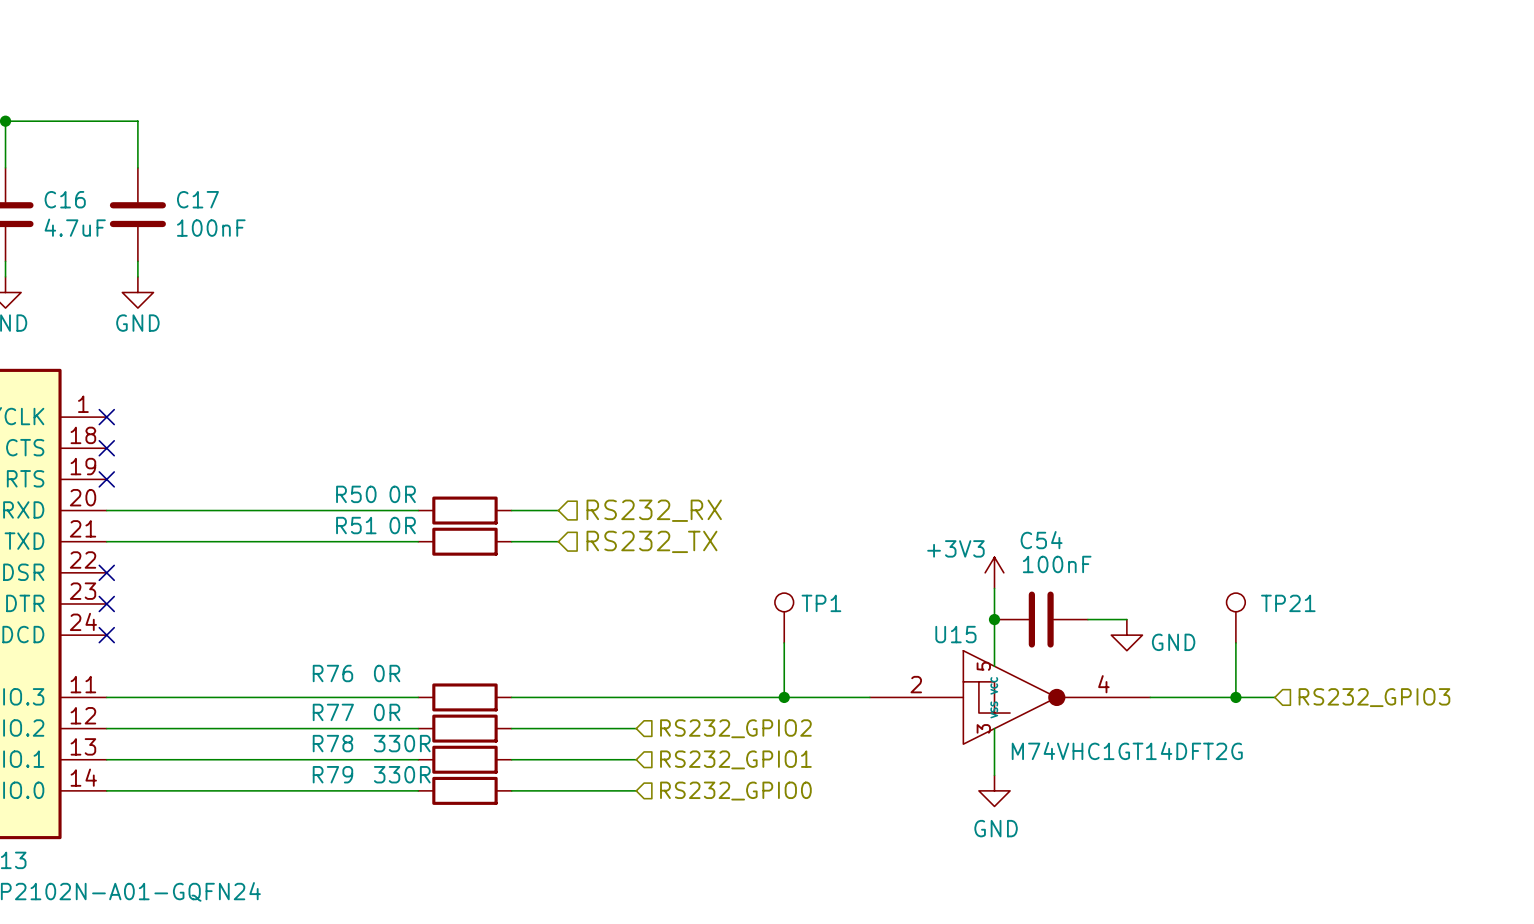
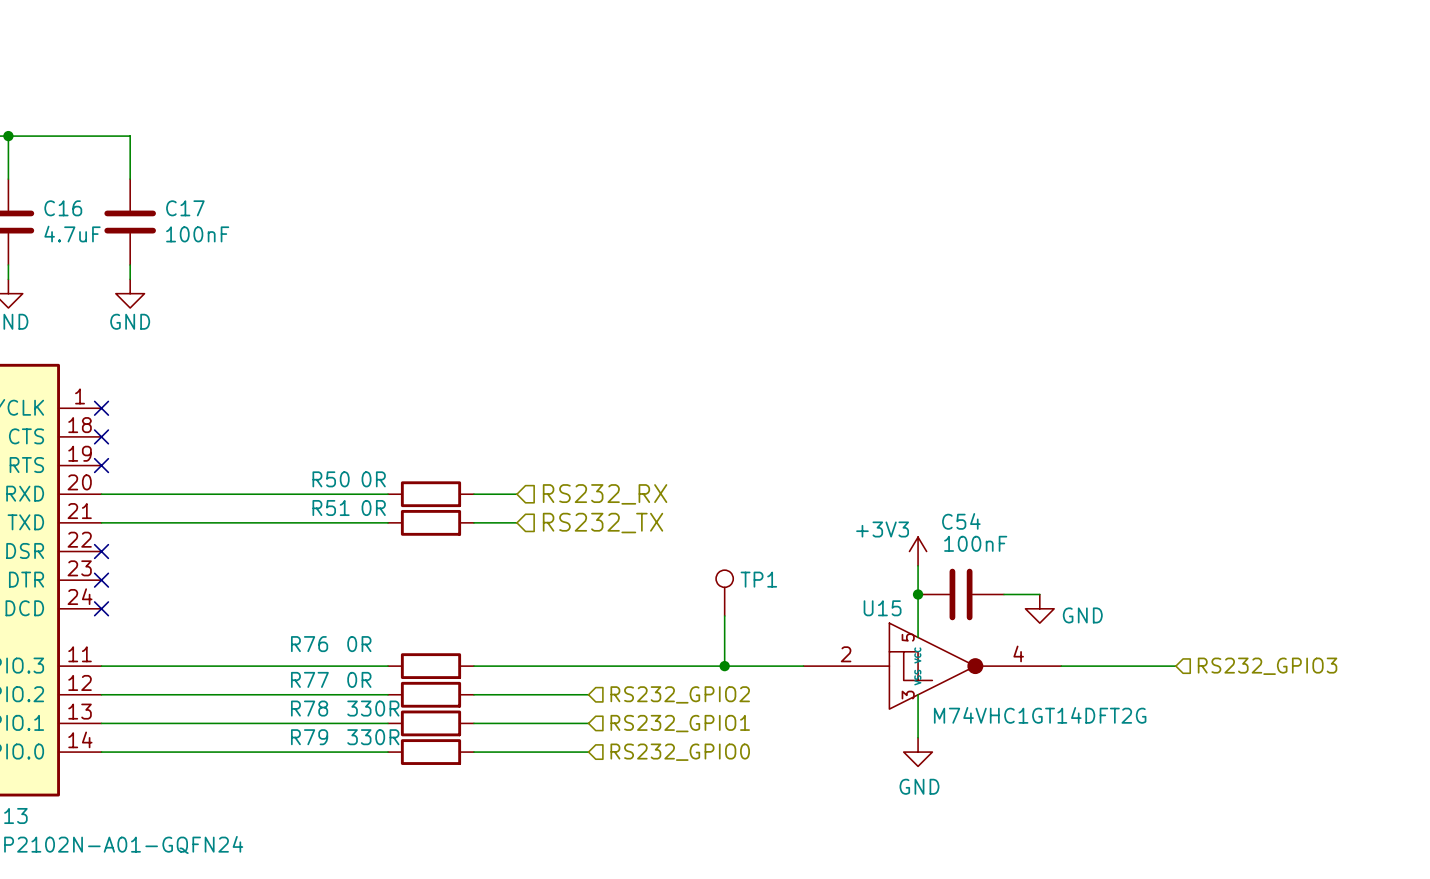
TP21: (1235, 618) -> none
wire: (1235, 642) (1235, 697) -> none
junction: (1235, 697) -> none

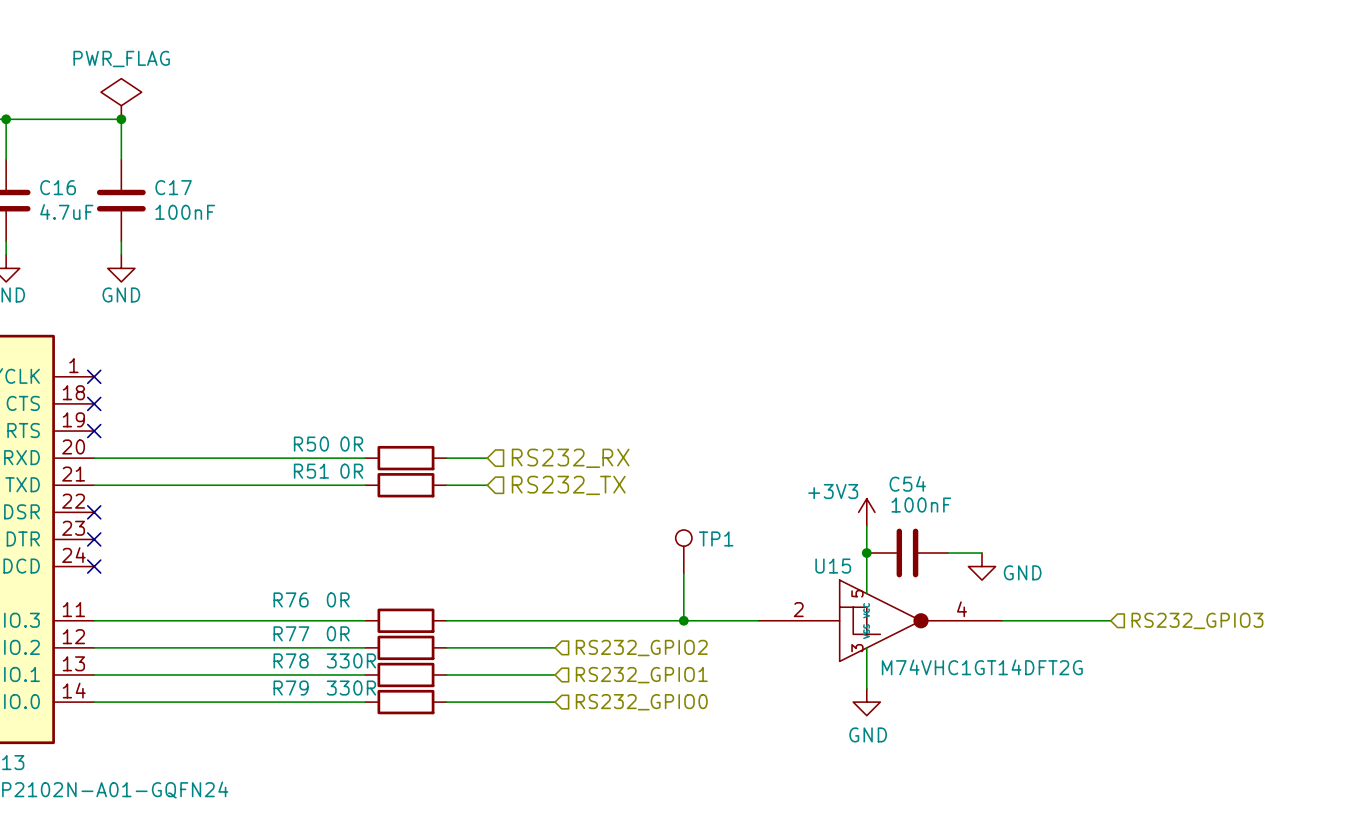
power symbol: none -> PWR_FLAG (121, 98)
junction: none -> (121, 119)

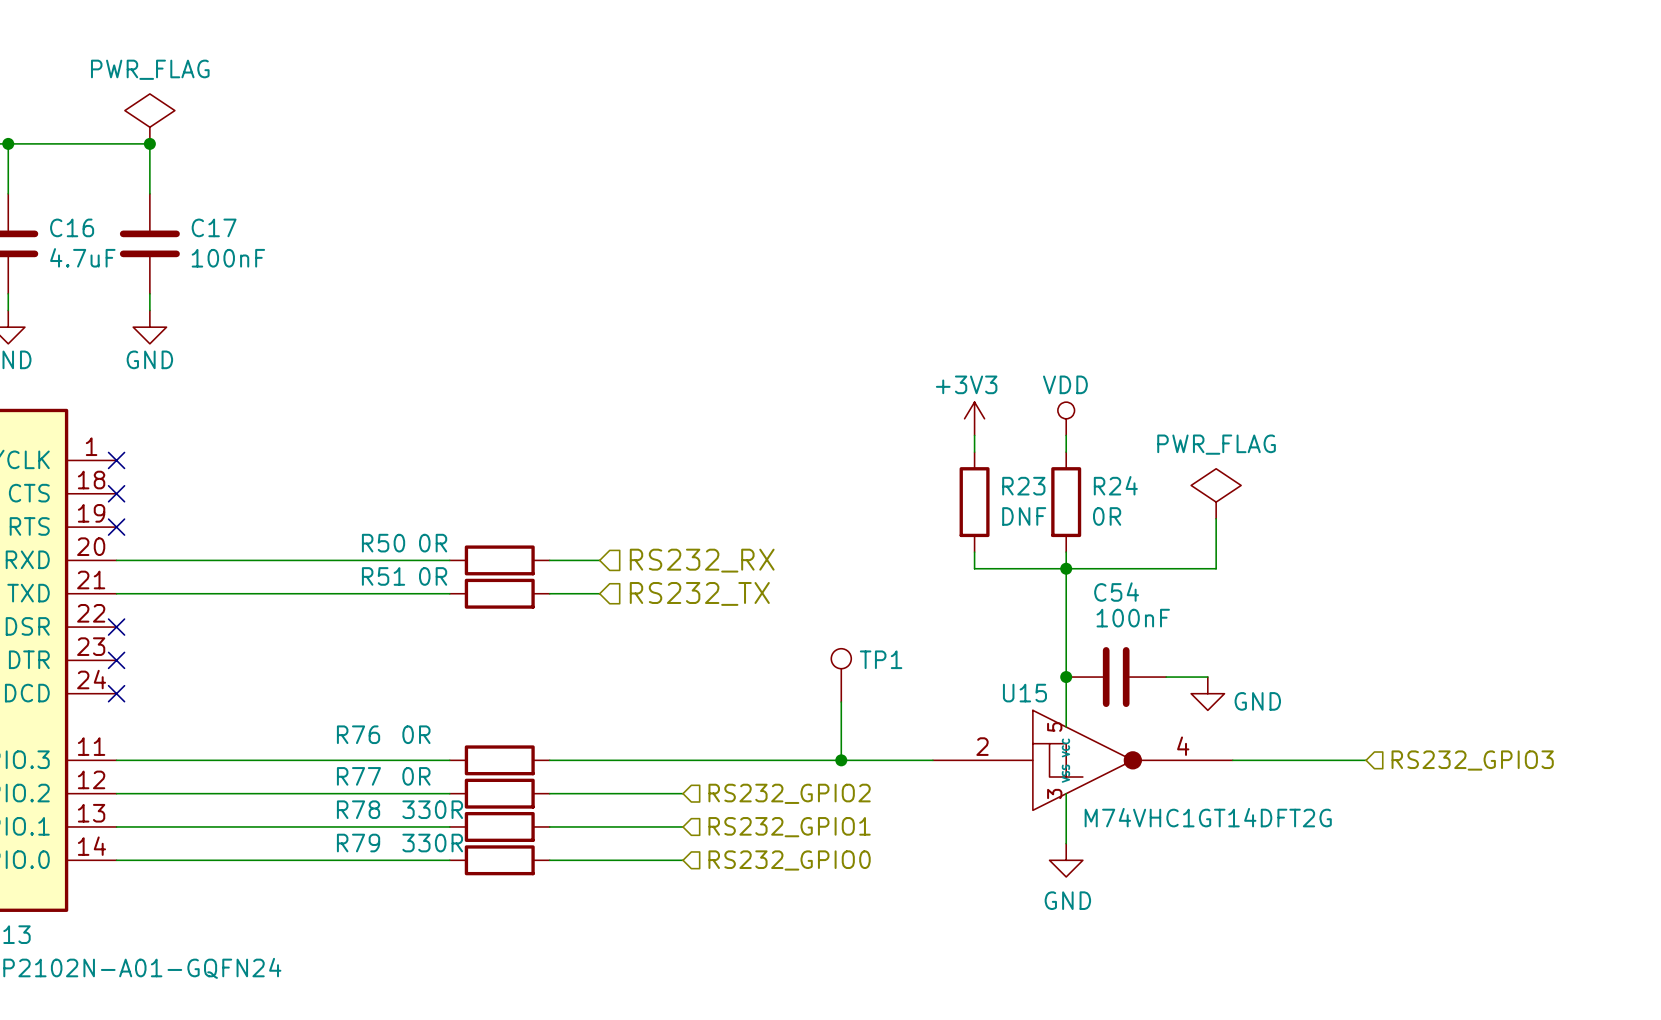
power symbol: none -> VDD (1066, 418)
wire: none -> (974, 435) (974, 452)
wire: none -> (1066, 435) (1066, 452)
power symbol: none -> PWR_FLAG (1216, 493)
R23: none -> DNF (974, 502)
R24: none -> 0R (1066, 502)
wire: none -> (1216, 518) (1216, 568) (974, 568) (974, 552)
wire: none -> (1066, 552) (1066, 643)
junction: none -> (1066, 568)
power symbol text position: +3V3 (833, 491) -> +3V3 (966, 384)
power symbol position: +3V3 (866, 512) -> +3V3 (974, 418)

